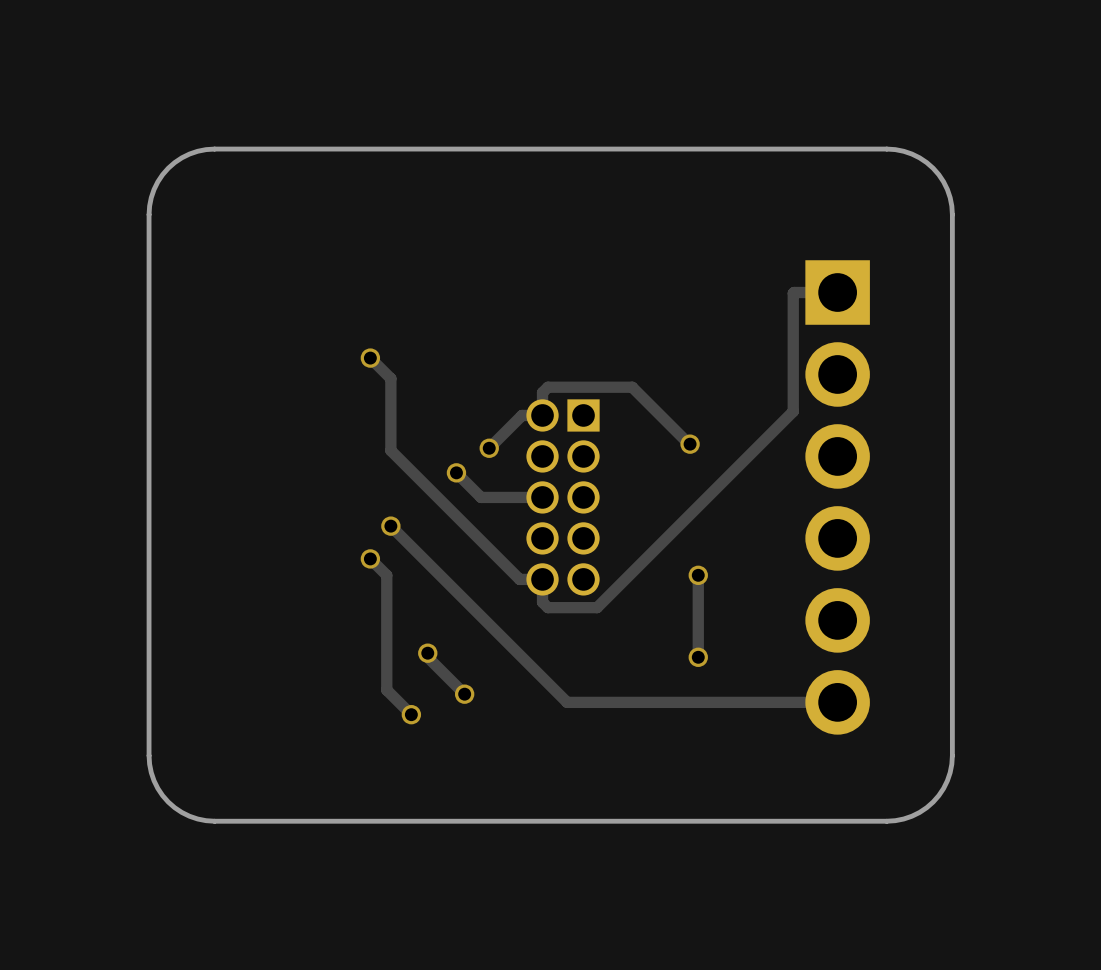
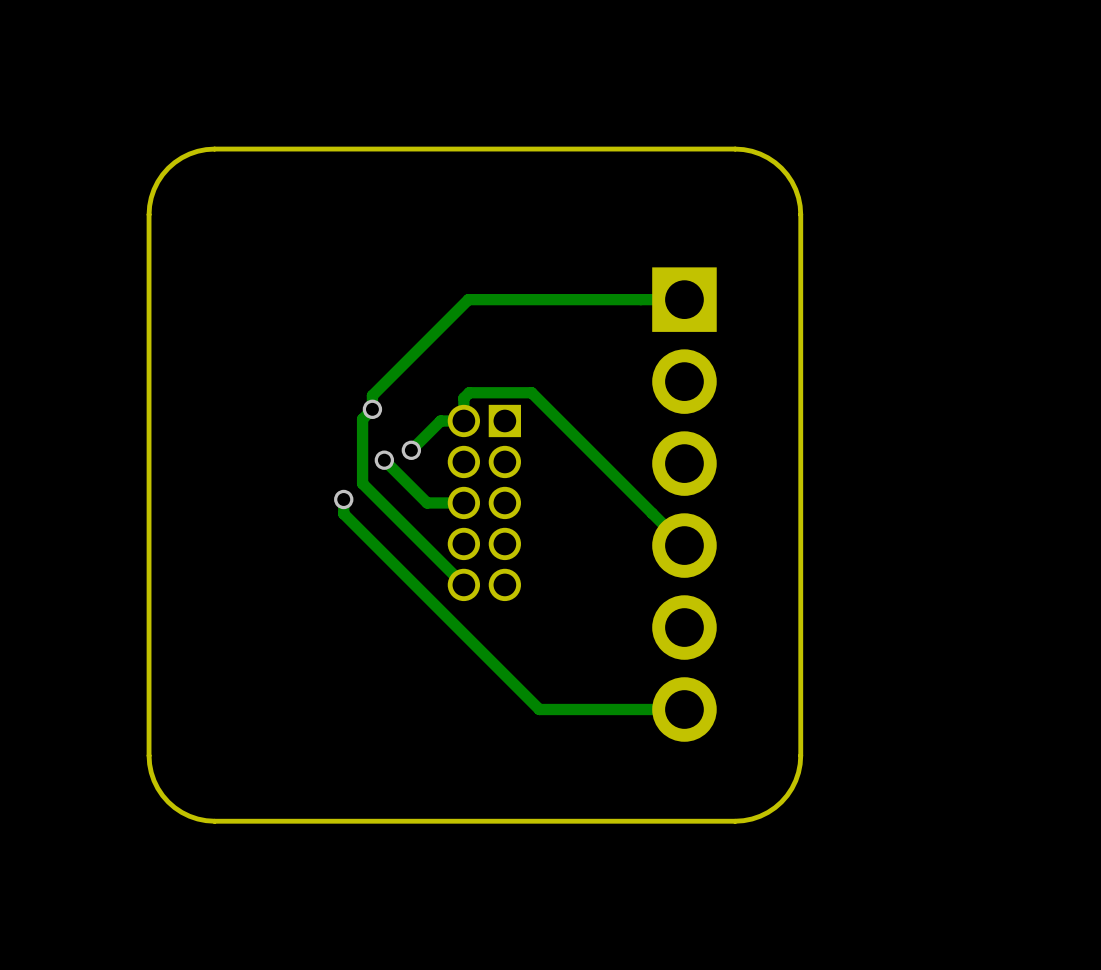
board edge: (735, 149) (886, 149) (903, 151) (919, 157) (938, 174) (947, 189) (952, 214) (952, 755) (947, 780) (938, 795) (926, 807) (911, 816) (895, 820) (735, 821) -> (735, 149) (760, 154) (781, 168) (795, 189) (800, 214) (800, 764) (791, 788) (775, 807) (752, 819) (735, 821)
track: (837, 292) (793, 293) (793, 411) (597, 607) (547, 607) (542, 602) (542, 579) (519, 579) (390, 450) (390, 378) (370, 358) -> none
track: none -> (684, 299) (468, 299) (372, 395) (372, 409) (362, 419) (362, 483) (463, 584)
via: (370, 358) -> none
via: none -> (372, 409)
track: (690, 444) (632, 387) (547, 387) (542, 392) (542, 415) (522, 415) (489, 448) -> none
via: (690, 444) -> none
via: (489, 448) -> none
track: none -> (411, 450) (440, 420) (463, 420) (463, 398) (469, 392) (531, 392) (684, 545)
via: none -> (411, 450)
track: none -> (384, 460) (427, 502) (463, 502)
via: none -> (384, 460)
track: (456, 472) (481, 497) (542, 497) -> none
via: (456, 472) -> none
part position: (563, 497) -> (484, 502)
part position: (837, 497) -> (684, 504)
track: none -> (343, 499) (343, 513) (539, 709) (684, 709)
via: none -> (343, 499)
track: (390, 526) (567, 702) (837, 702) -> none
via: (390, 526) -> none
track: (370, 558) (386, 575) (386, 690) (411, 714) -> none
via: (370, 558) -> none
track: (698, 575) (698, 657) -> none
via: (698, 575) -> none
track: (427, 653) (427, 657) (464, 694) -> none
via: (427, 653) -> none
via: (698, 657) -> none
via: (464, 694) -> none
via: (411, 714) -> none

